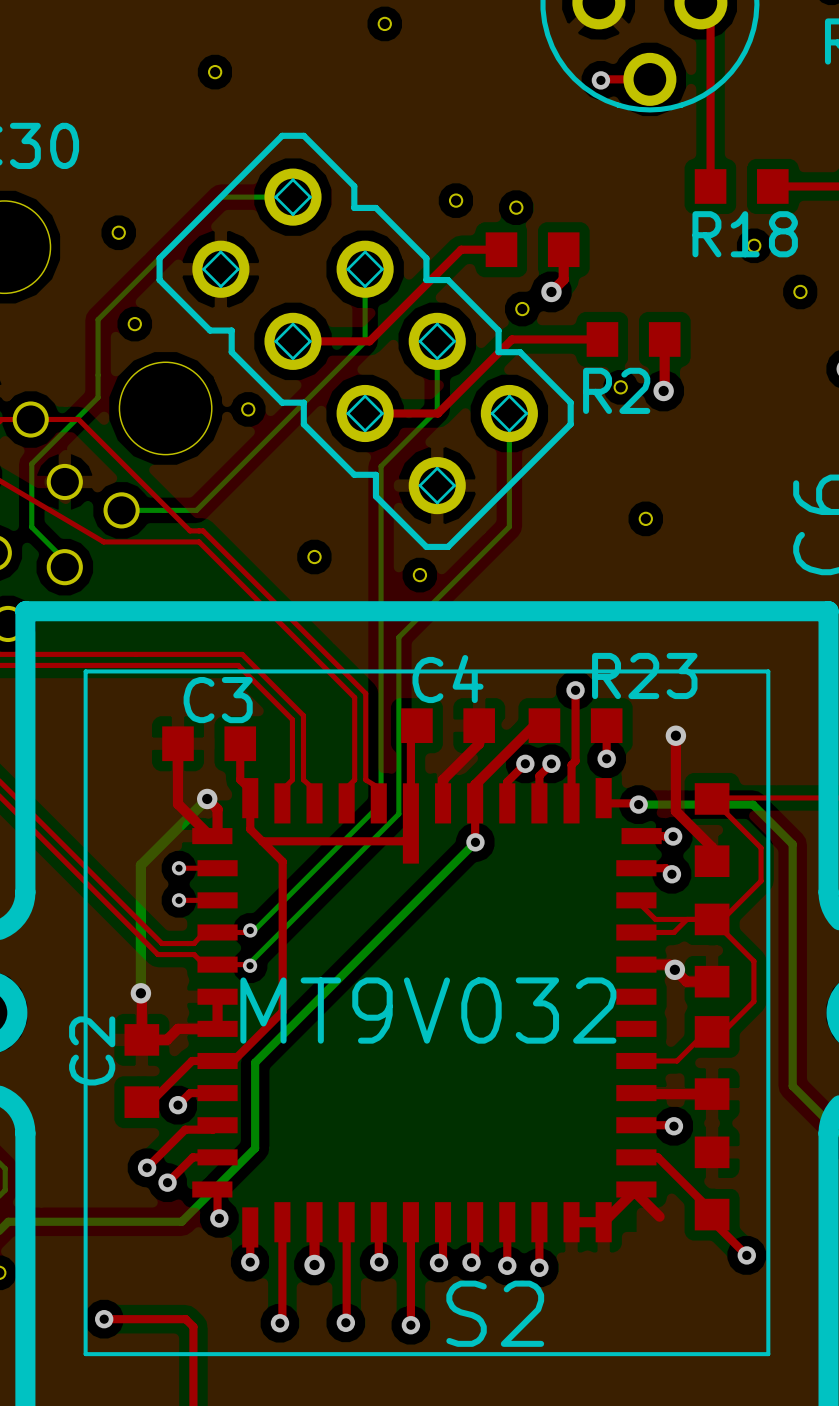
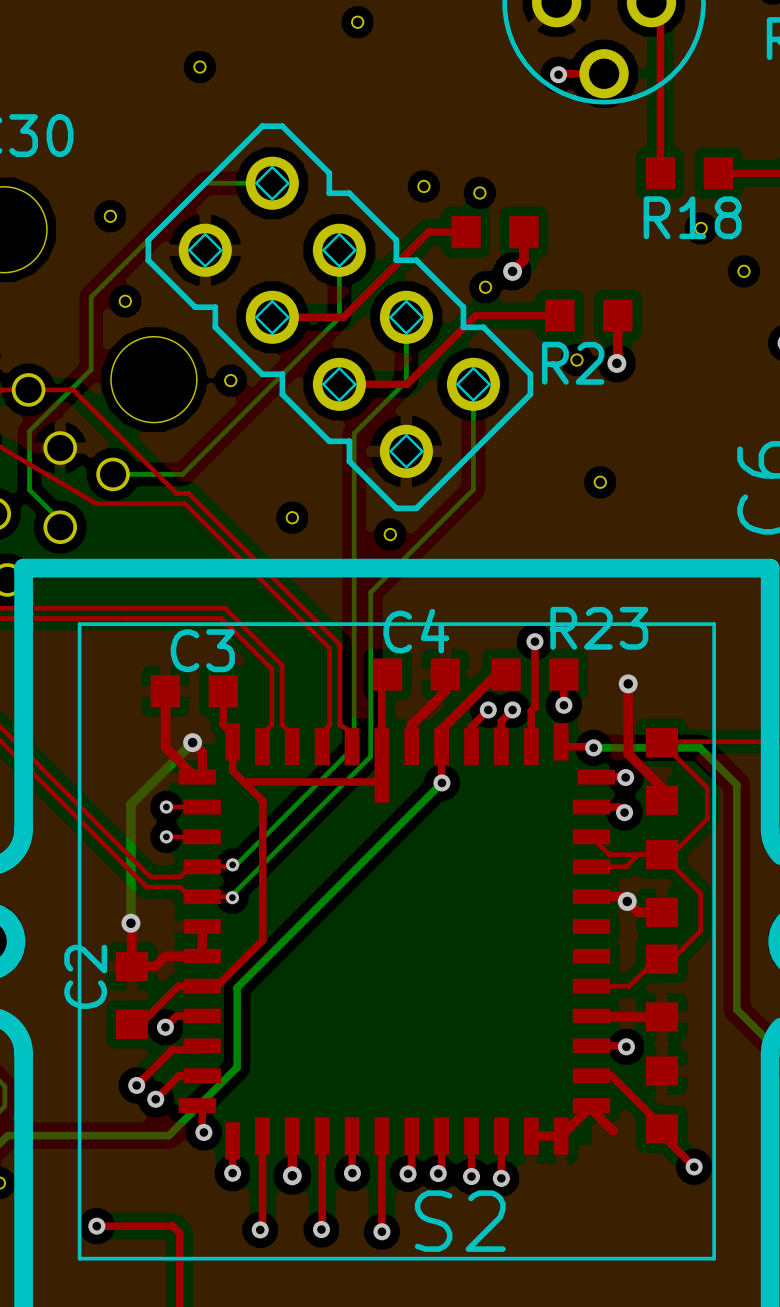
S2 value: MT9V032 (428, 1010) -> none

